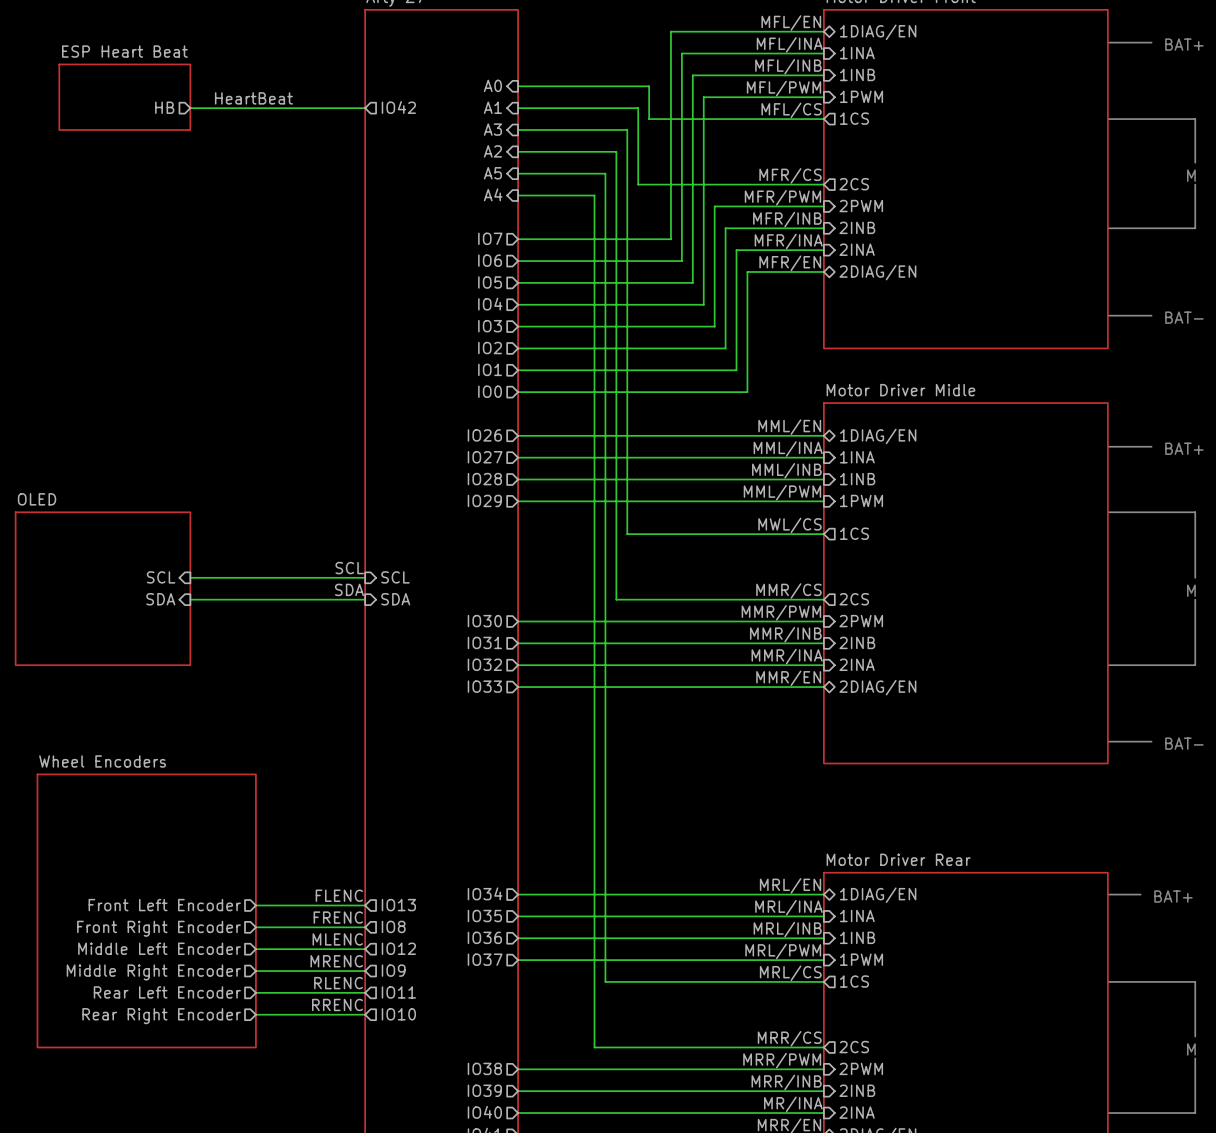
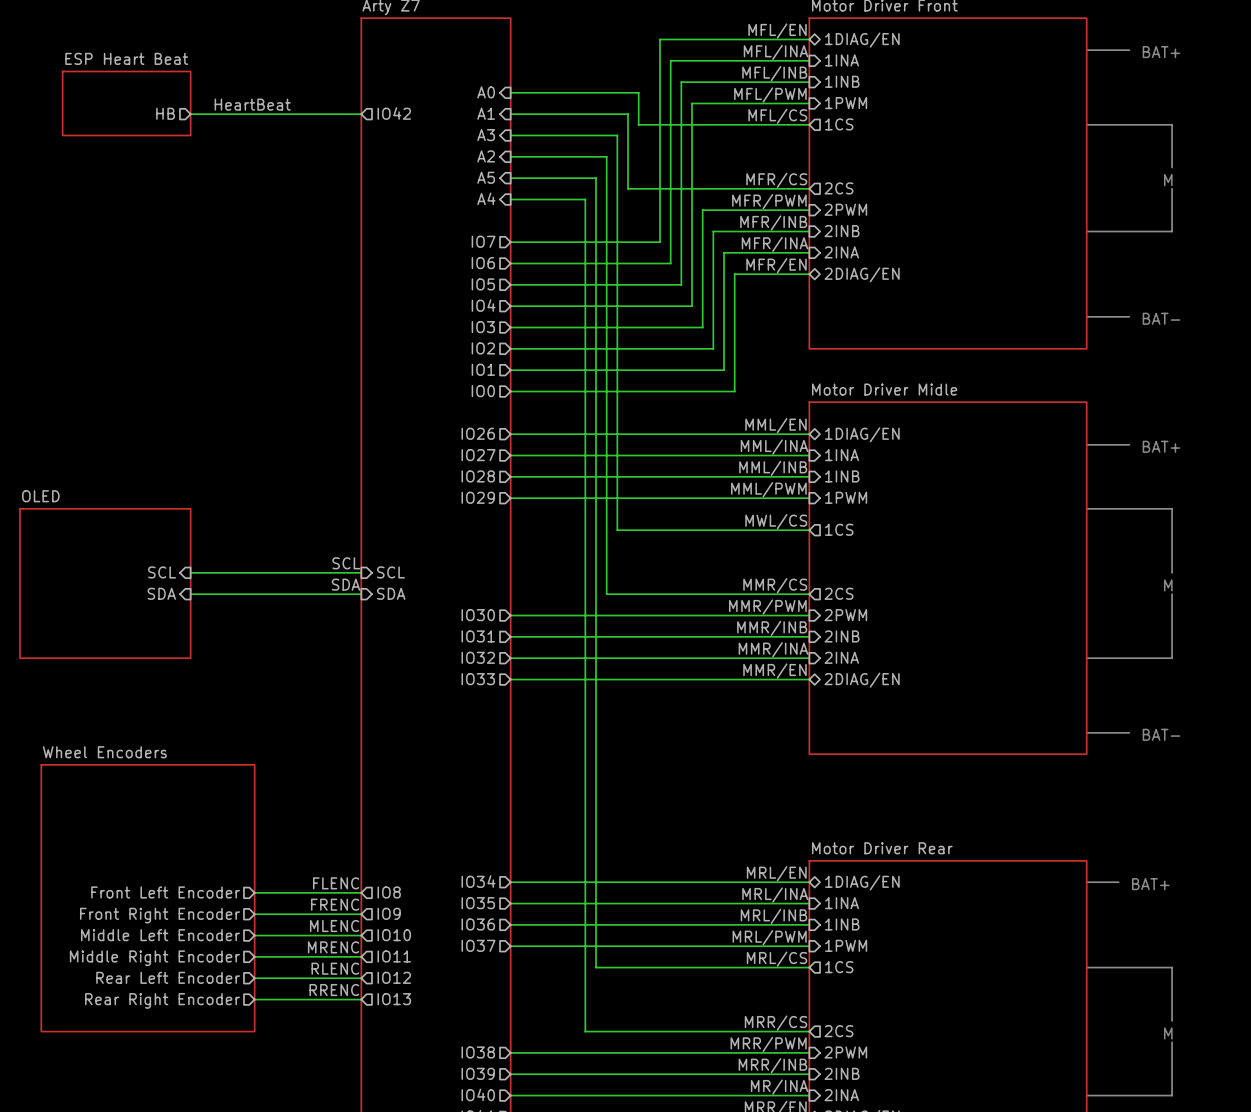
sheet pin: IO13 (398, 905) -> IO8 (389, 892)
sheet pin: IO8 (393, 926) -> IO9 (389, 913)
sheet pin: IO12 (398, 948) -> IO10 (394, 935)
sheet pin: IO9 (393, 970) -> IO11 (394, 956)
sheet pin: IO11 (398, 992) -> IO12 (394, 977)
sheet pin: IO10 (398, 1014) -> IO13 (394, 999)

